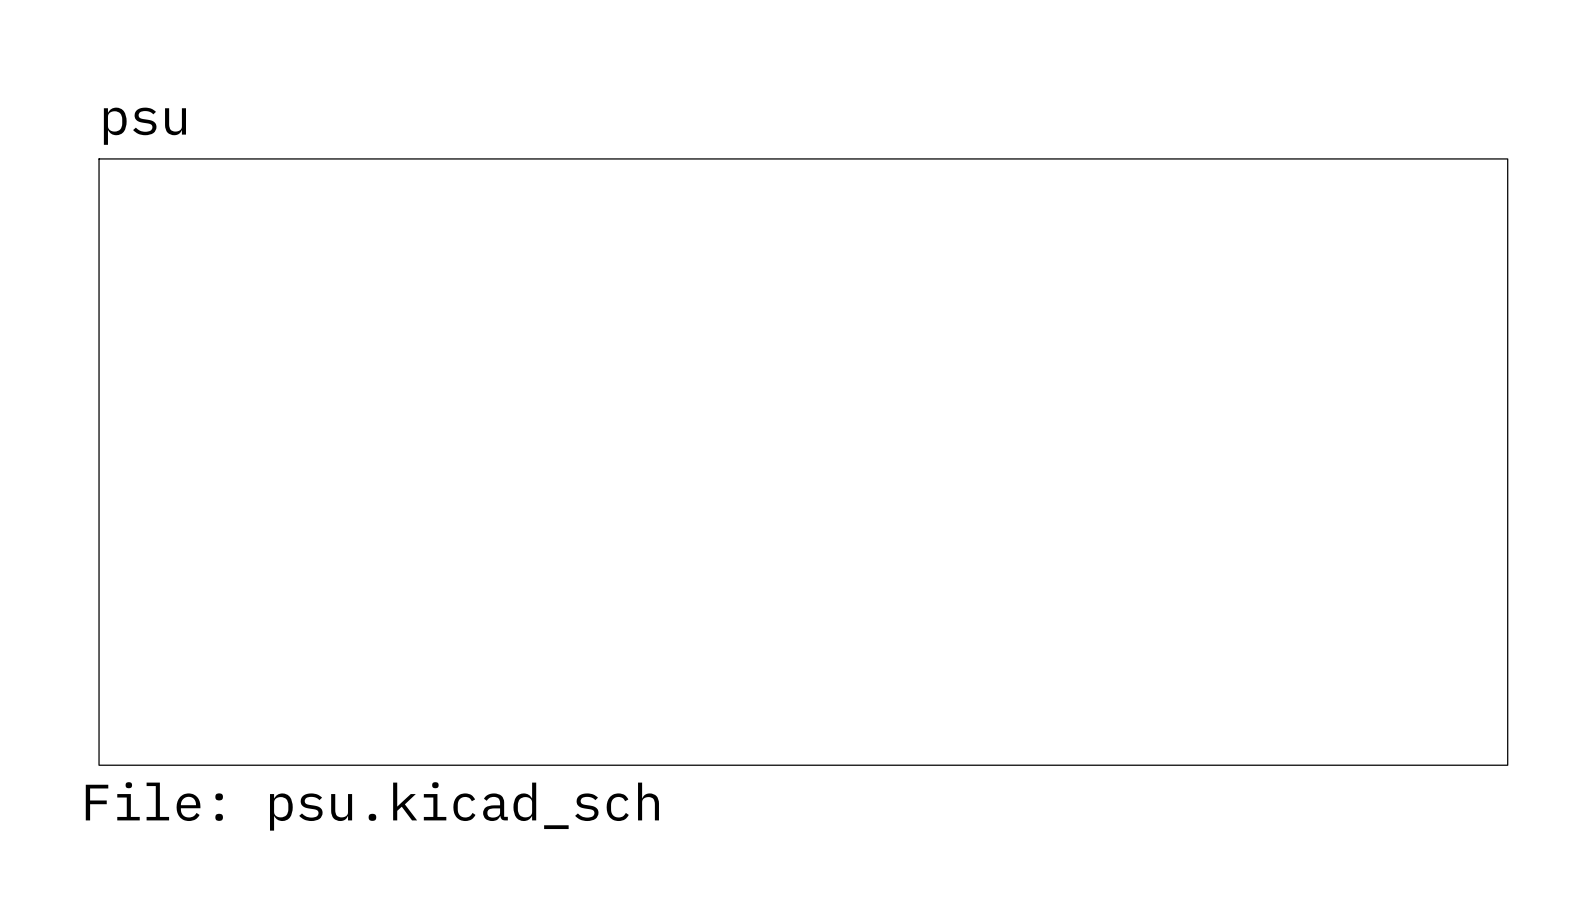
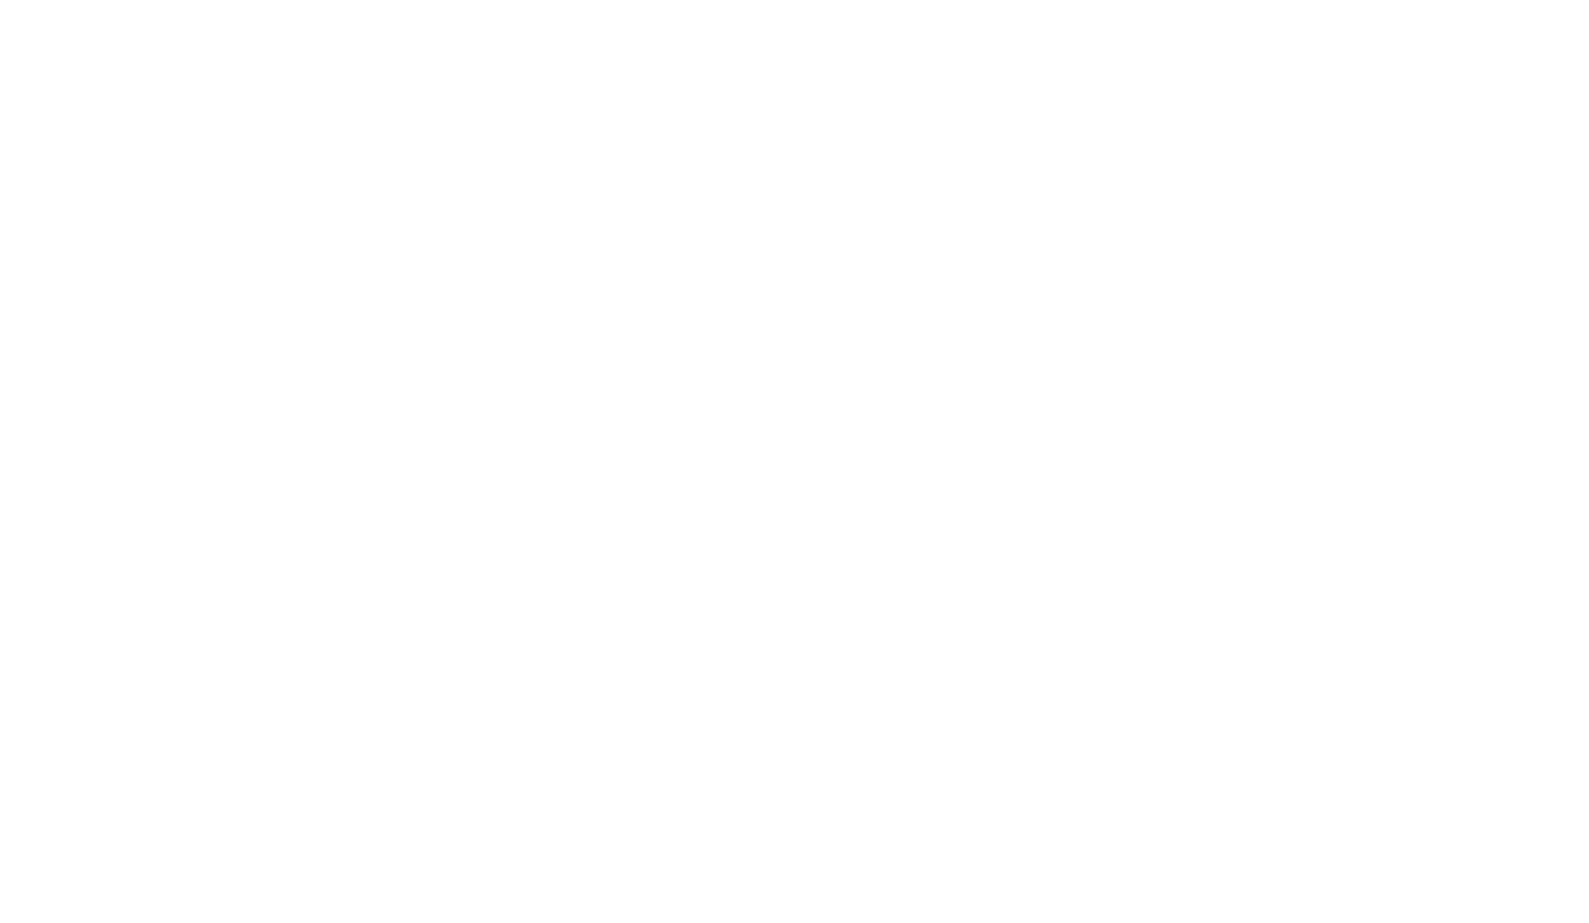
sheet psu: File: psu.kicad_sch (803, 462) -> none

